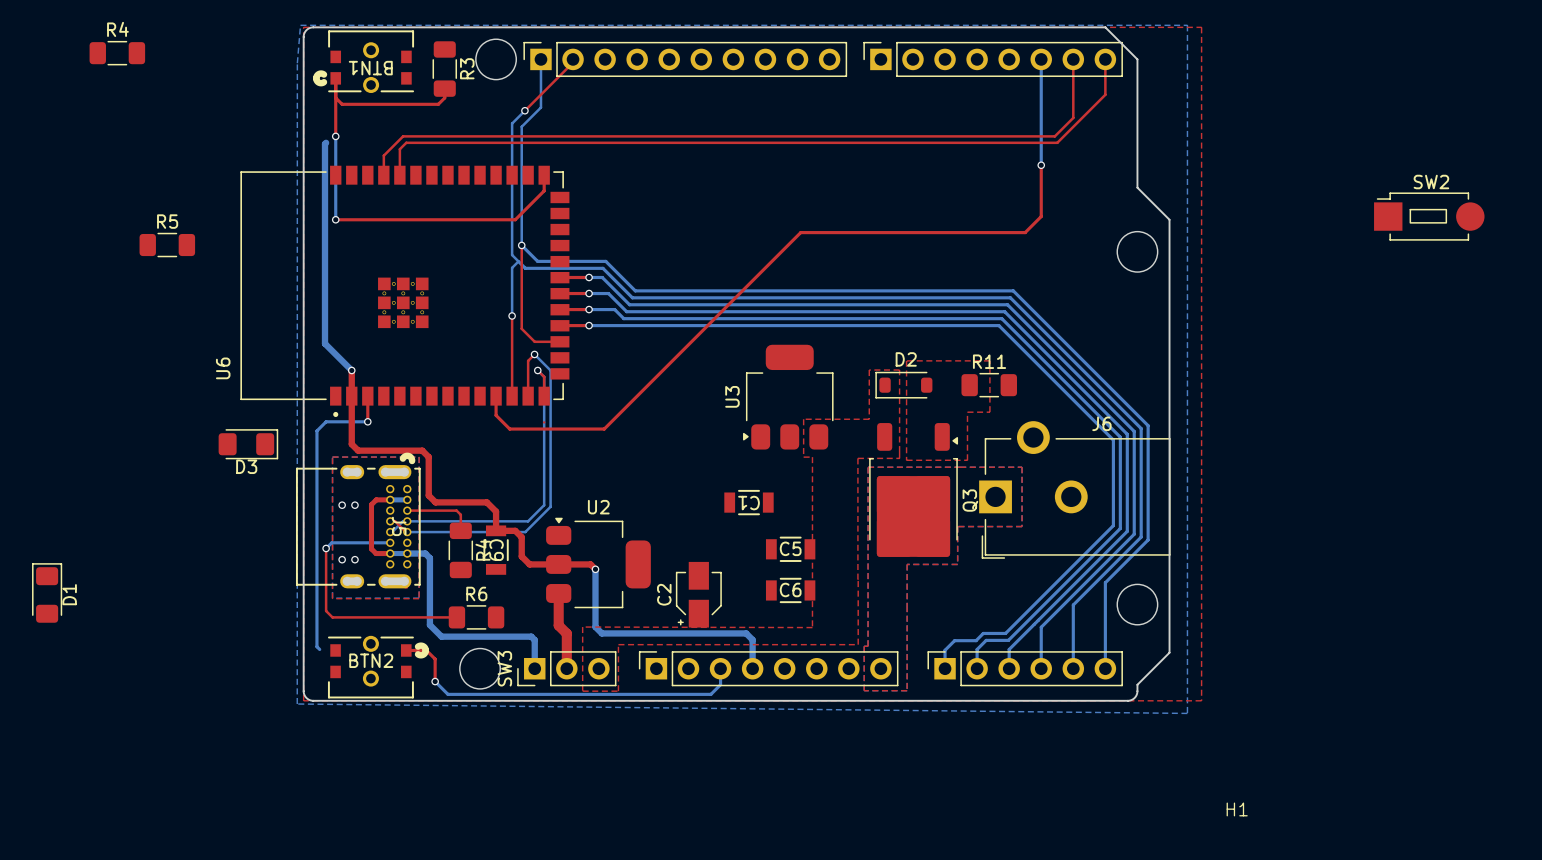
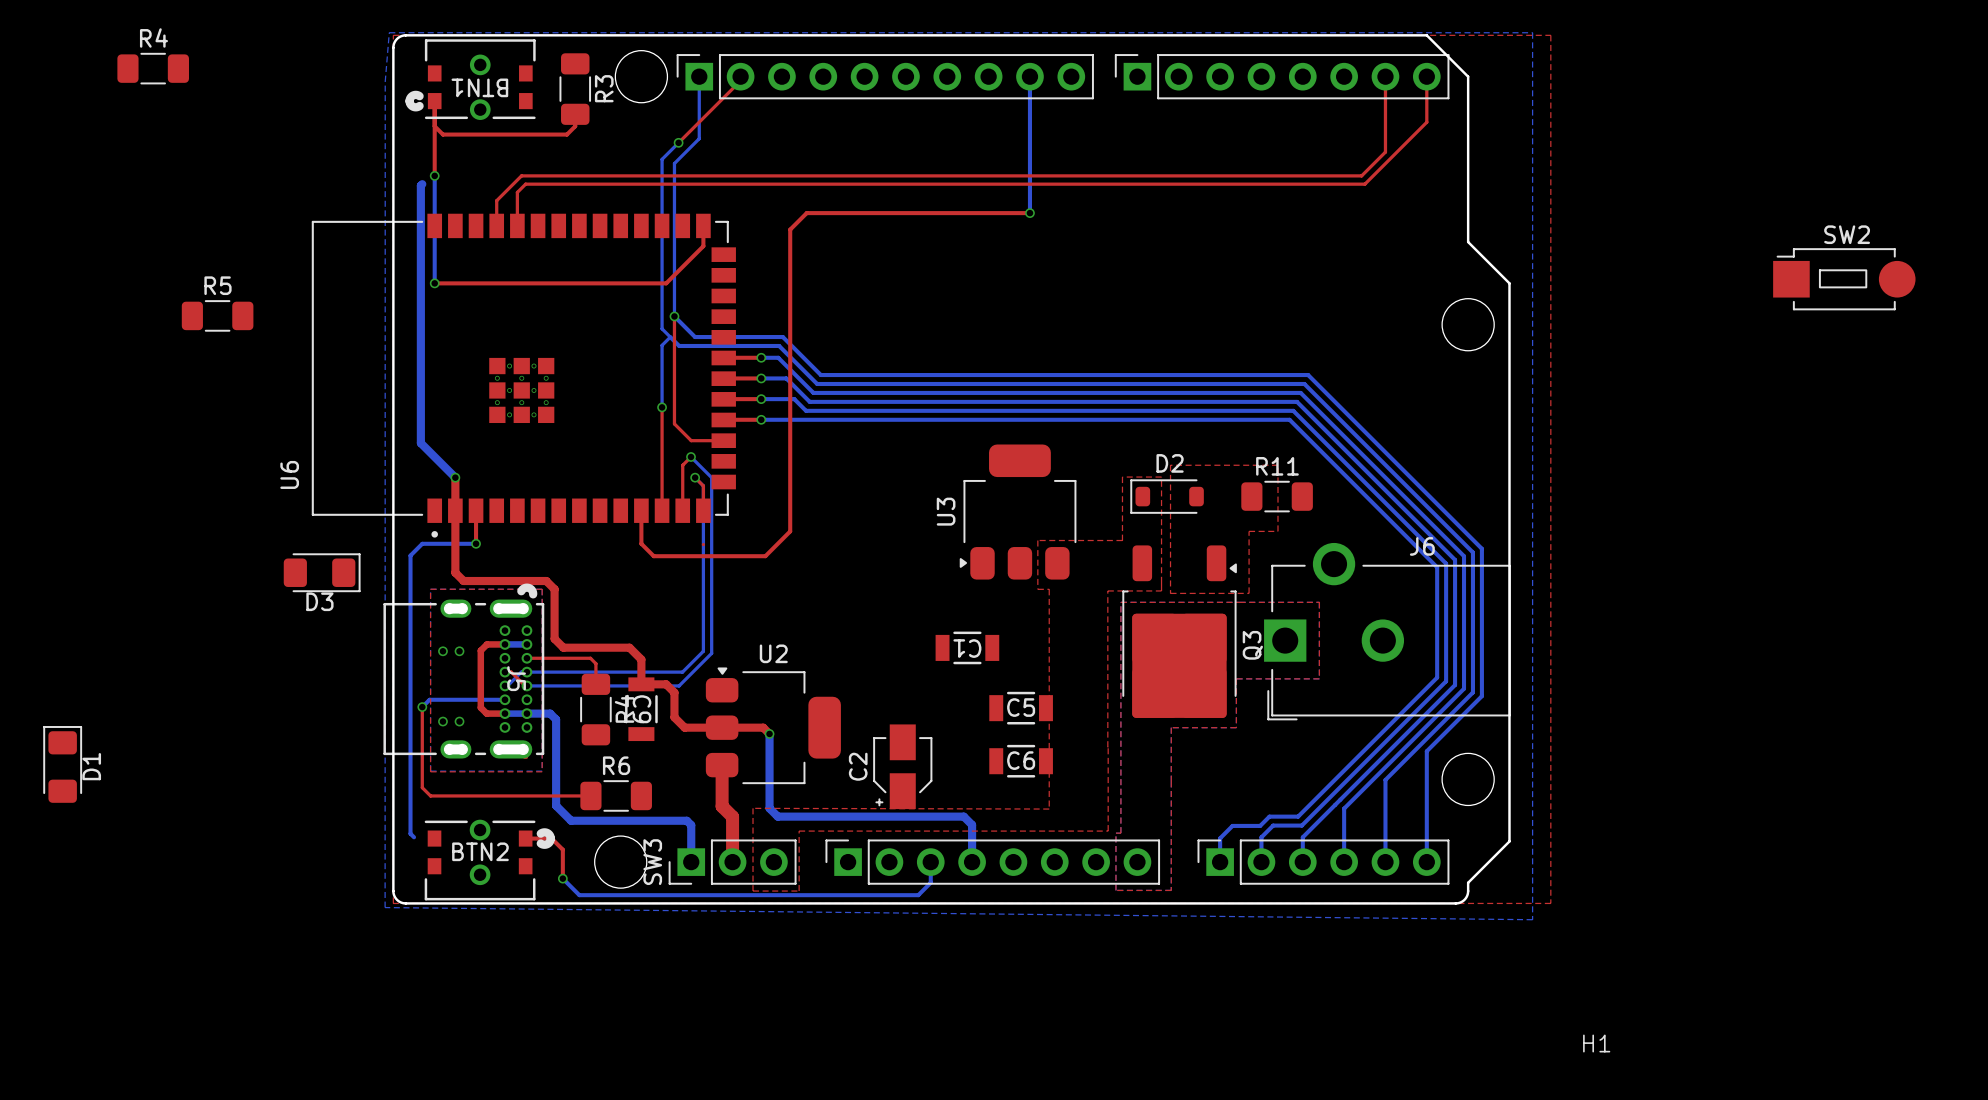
bottom track: (1041, 59) (1041, 165) -> (1029, 76) (1029, 213)
via: none -> (1029, 213)
top track: (1041, 165) (1041, 216) (1025, 232) (800, 232) (604, 429) (509, 429) (496, 415) -> (1029, 213) (806, 213) (790, 229) (790, 531) (765, 556) (653, 556) (641, 543) (641, 535)
via: (1041, 165) -> none

